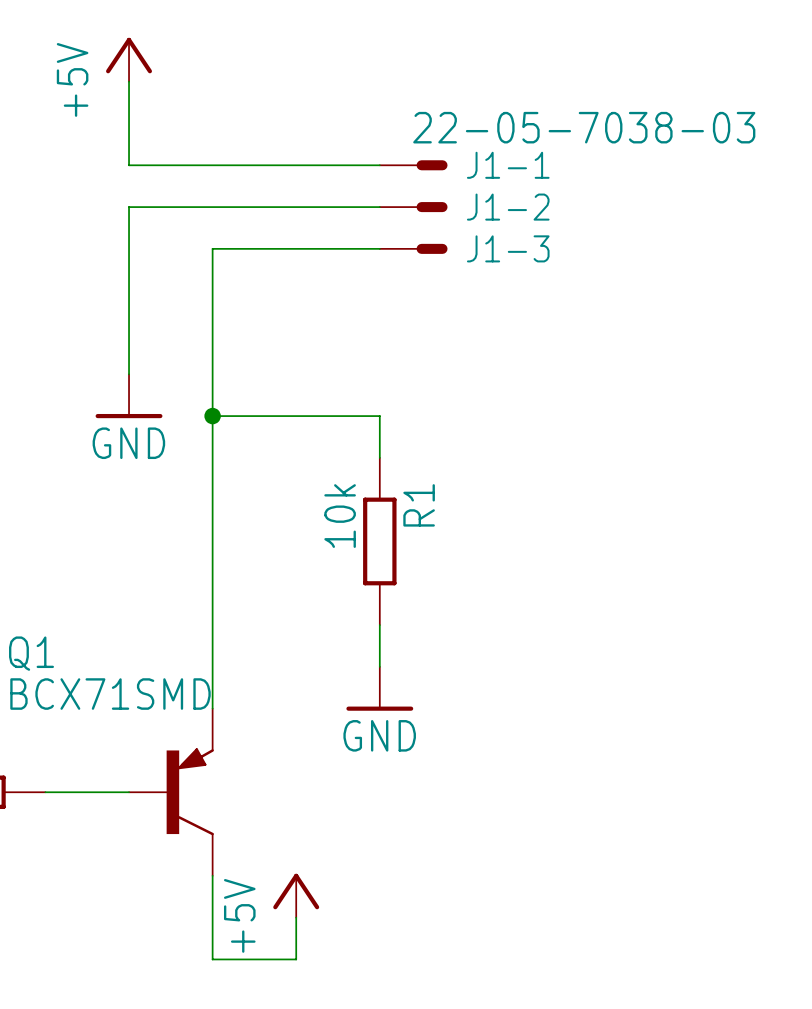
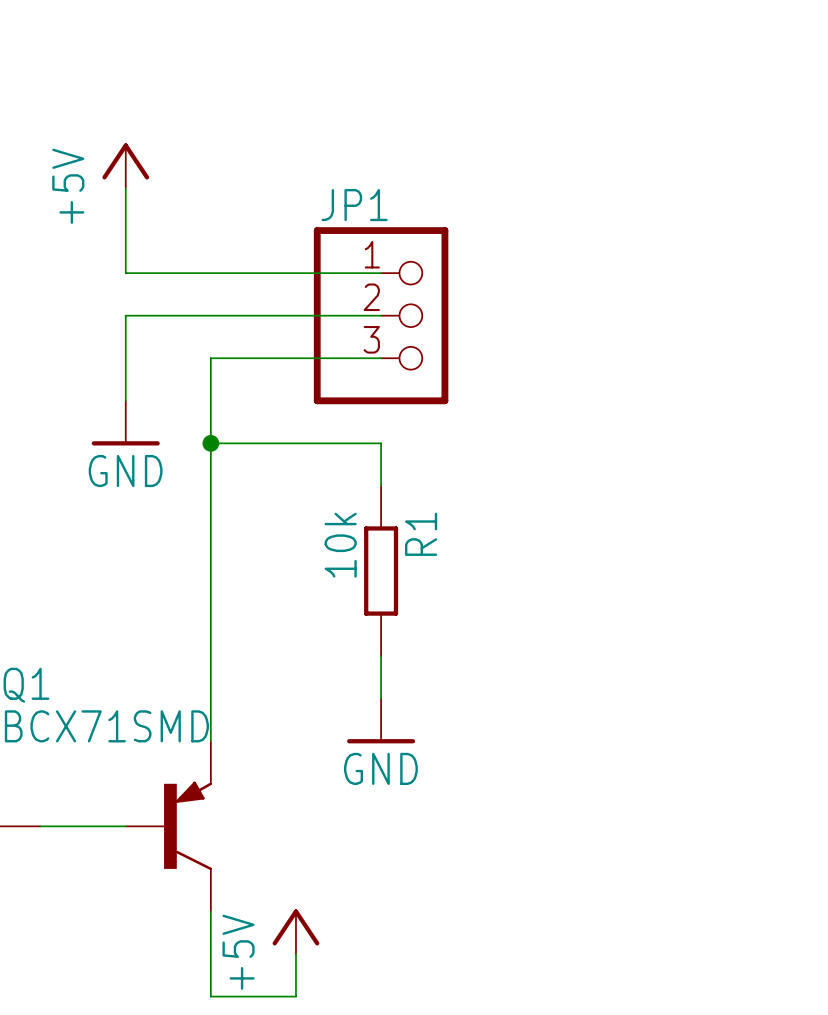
power symbol position: +5V (129, 59) -> +5V (125, 165)
wire: (129, 81) (129, 165) (379, 165) -> none
J1-1: 22-05-7038-03 (413, 165) -> none
wire: (129, 207) (379, 207) -> (125, 230) (125, 188)
J1-2: (413, 207) -> none
wire: (129, 248) (129, 290) -> (125, 273) (210, 273)
wire: (212, 248) (212, 332) -> (381, 358) (210, 358)
J1-3: (413, 248) -> none
wire: none -> (125, 315) (381, 315)
JP1: none -> (381, 315)

